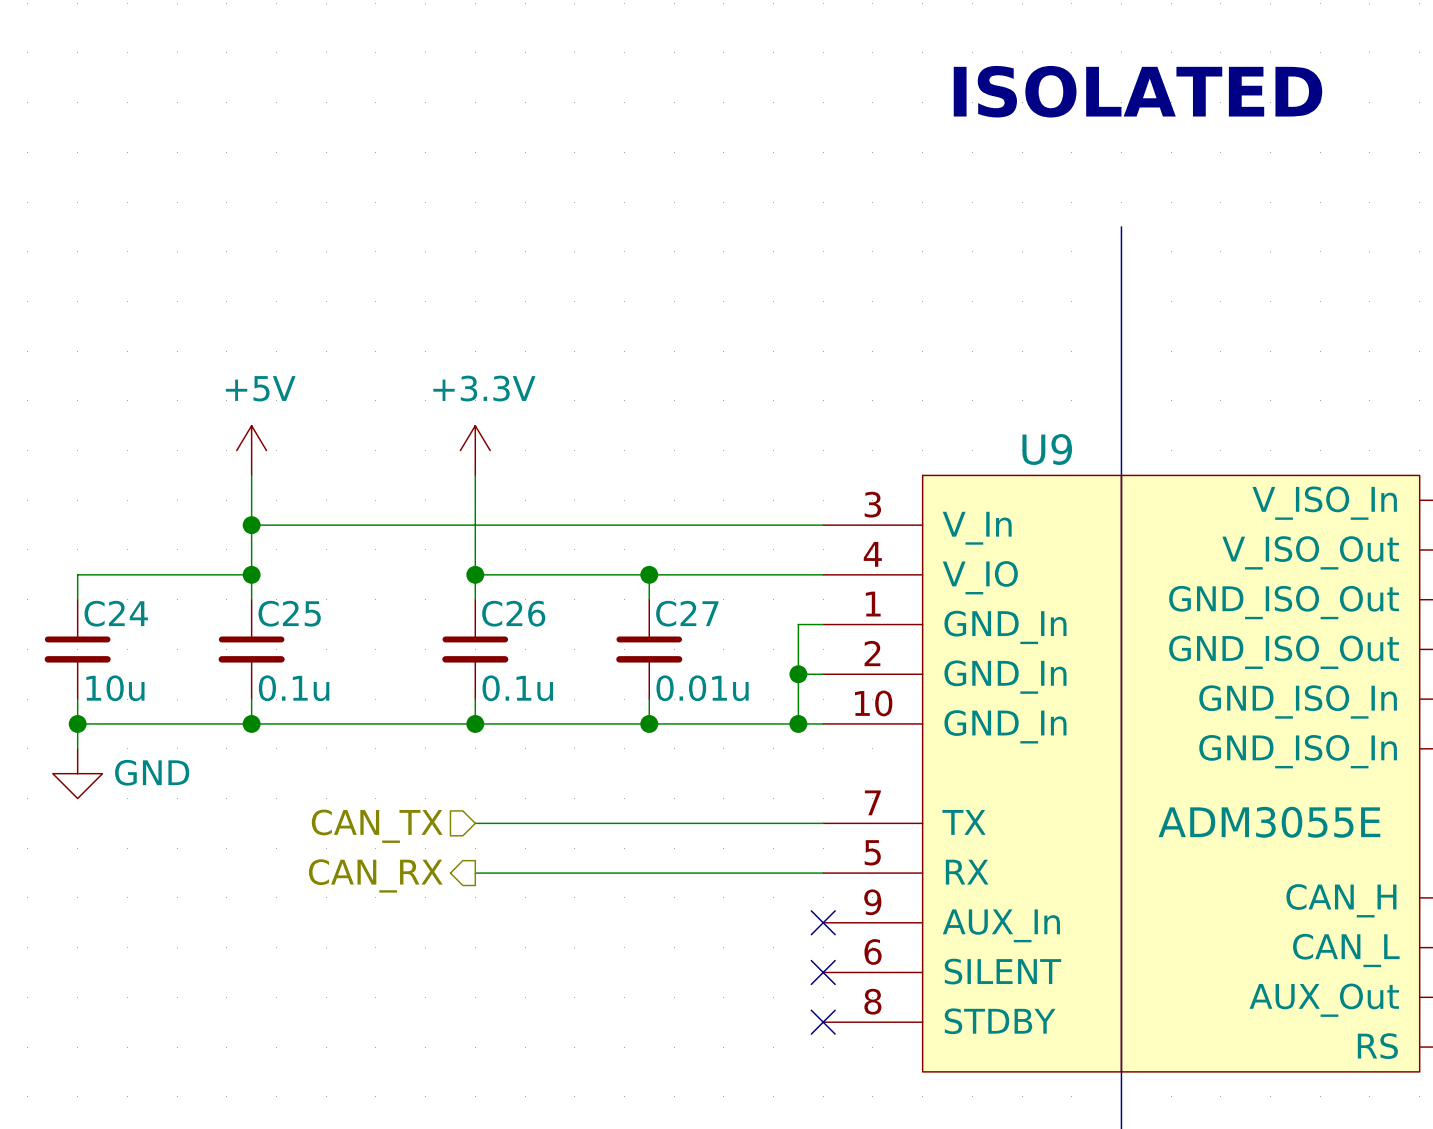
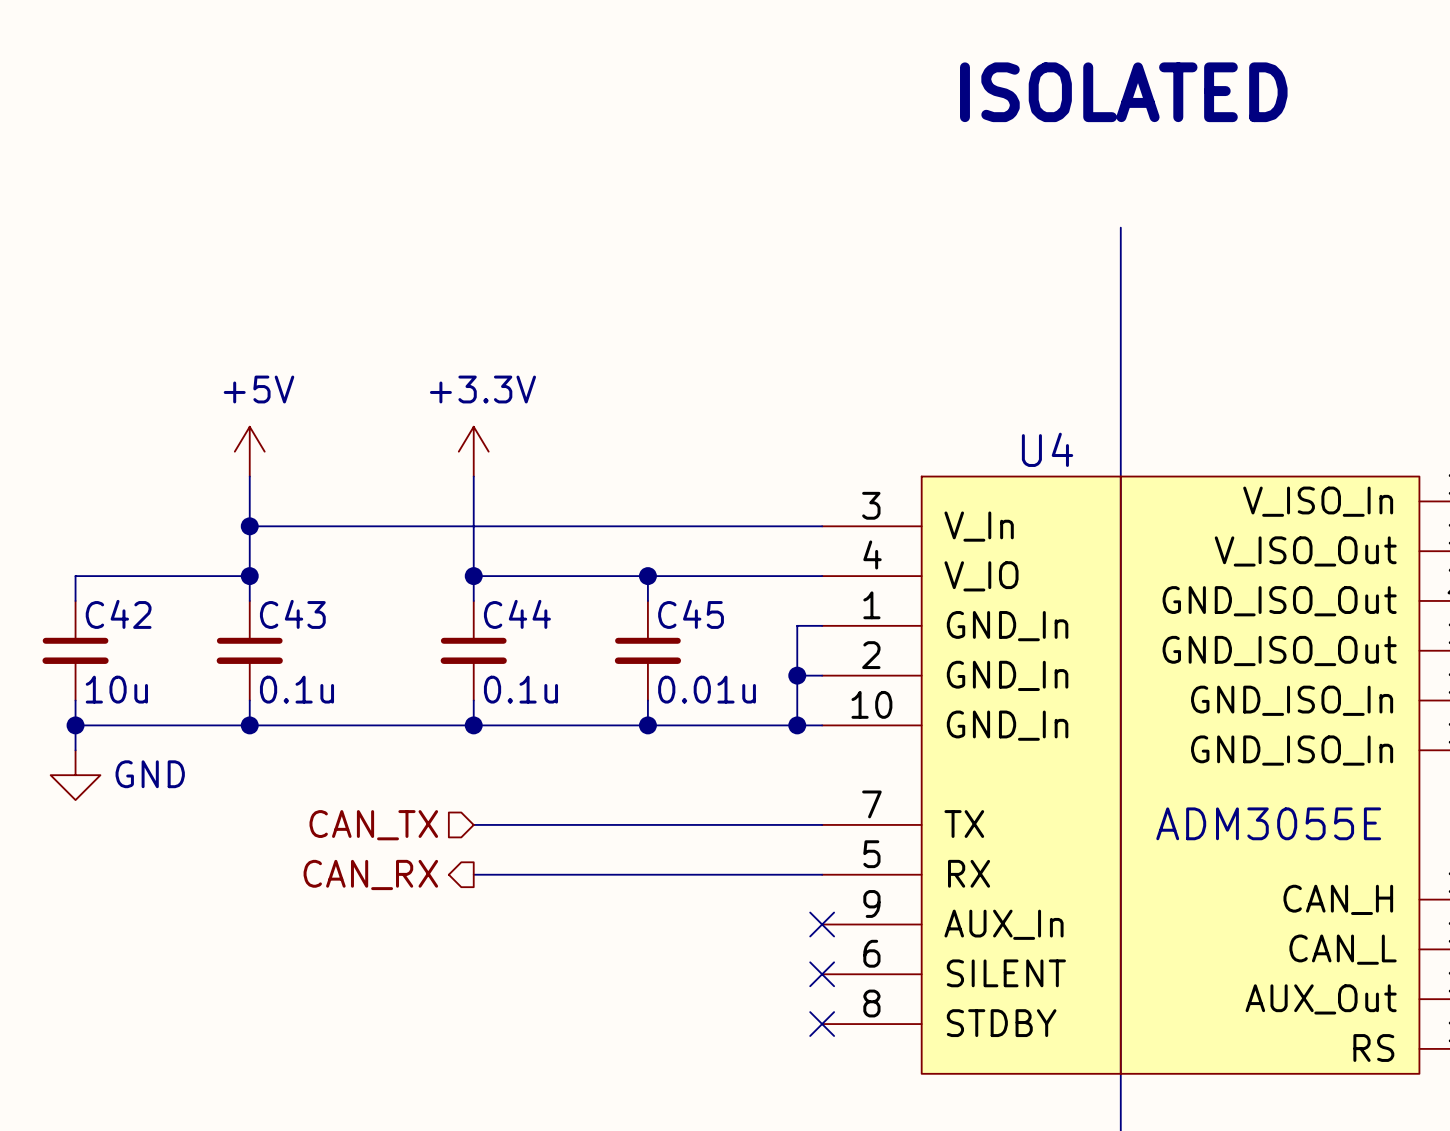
U9 name: U9 (1047, 449) -> U4 (1047, 449)
C24 name: C24 (116, 613) -> C42 (118, 614)
C25 name: C25 (289, 613) -> C43 (292, 614)
C26 name: C26 (513, 613) -> C44 (517, 614)
C27 name: C27 (687, 613) -> C45 (691, 614)

